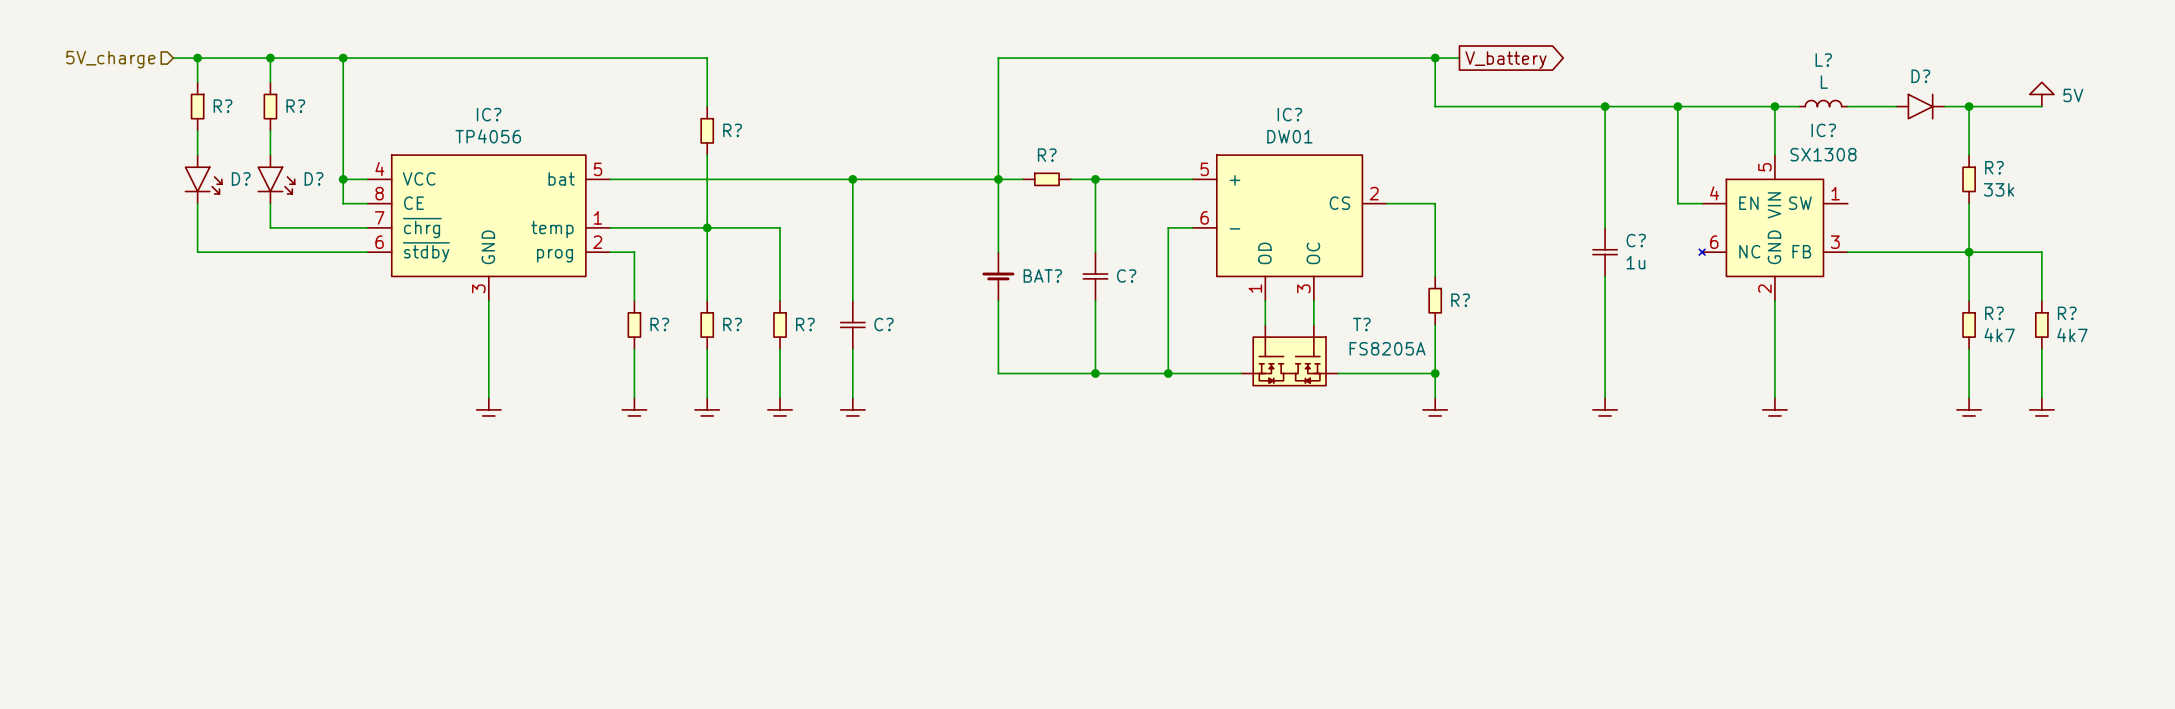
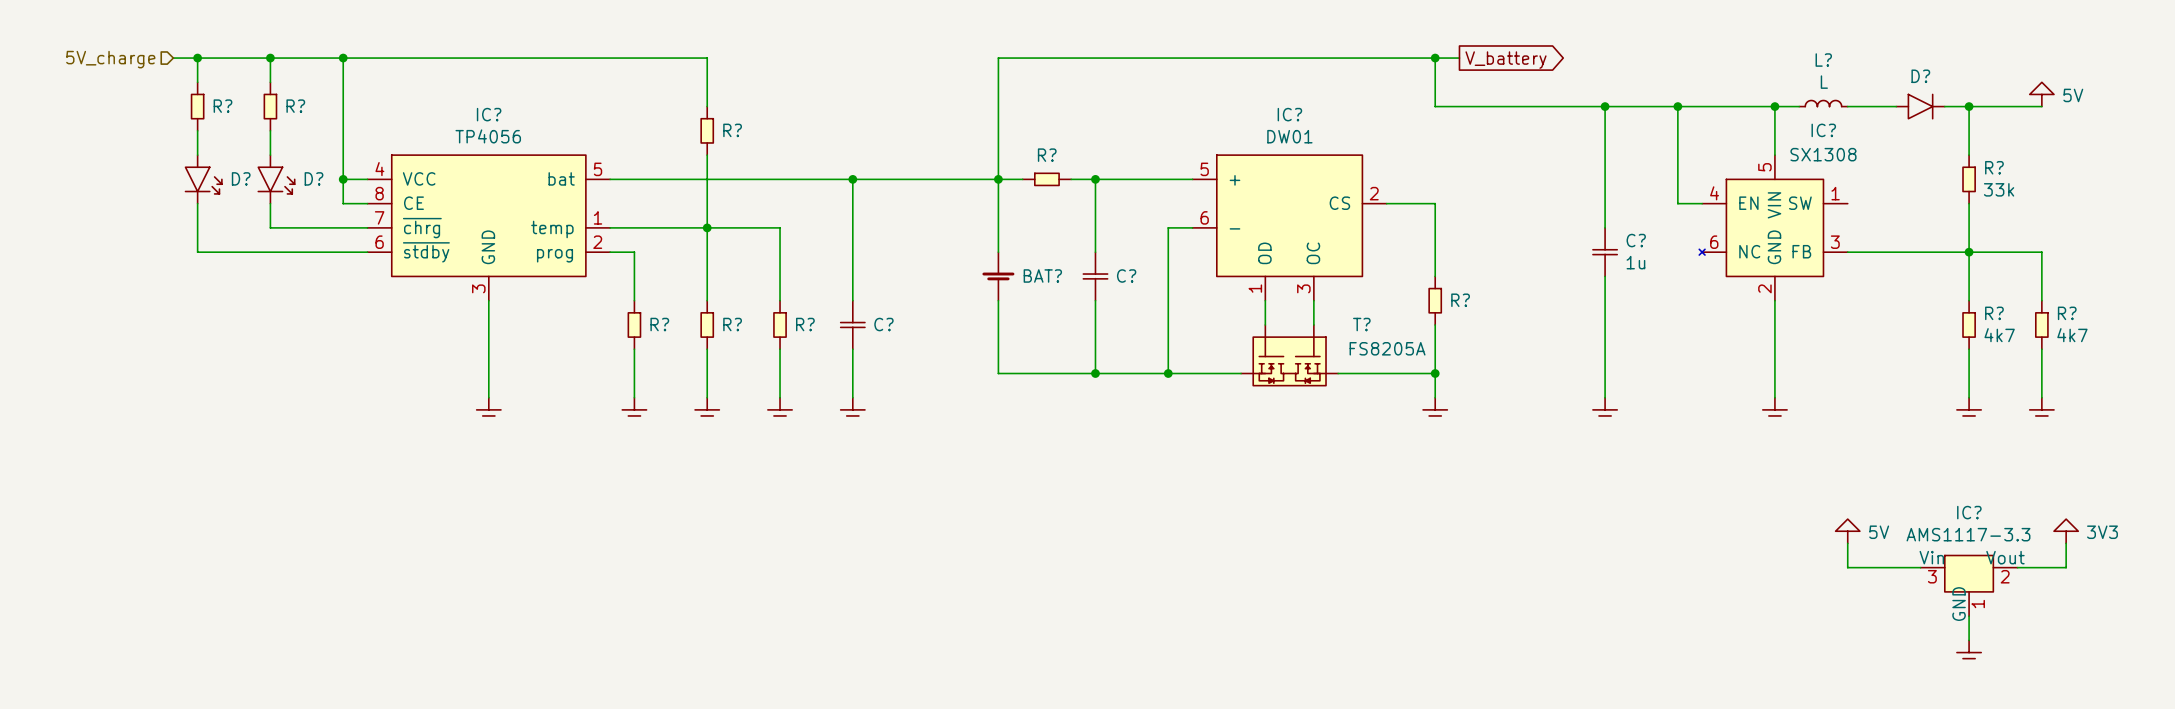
power symbol: none -> 5V (1847, 531)
power symbol: none -> 3V3 (2066, 531)
wire: none -> (1847, 543) (1847, 567) (1920, 567)
wire: none -> (2066, 543) (2066, 567) (2017, 567)
IC?: none -> AMS1117-3.3 (1969, 585)
wire: none -> (1969, 616) (1969, 640)
power symbol: none -> (1969, 652)

